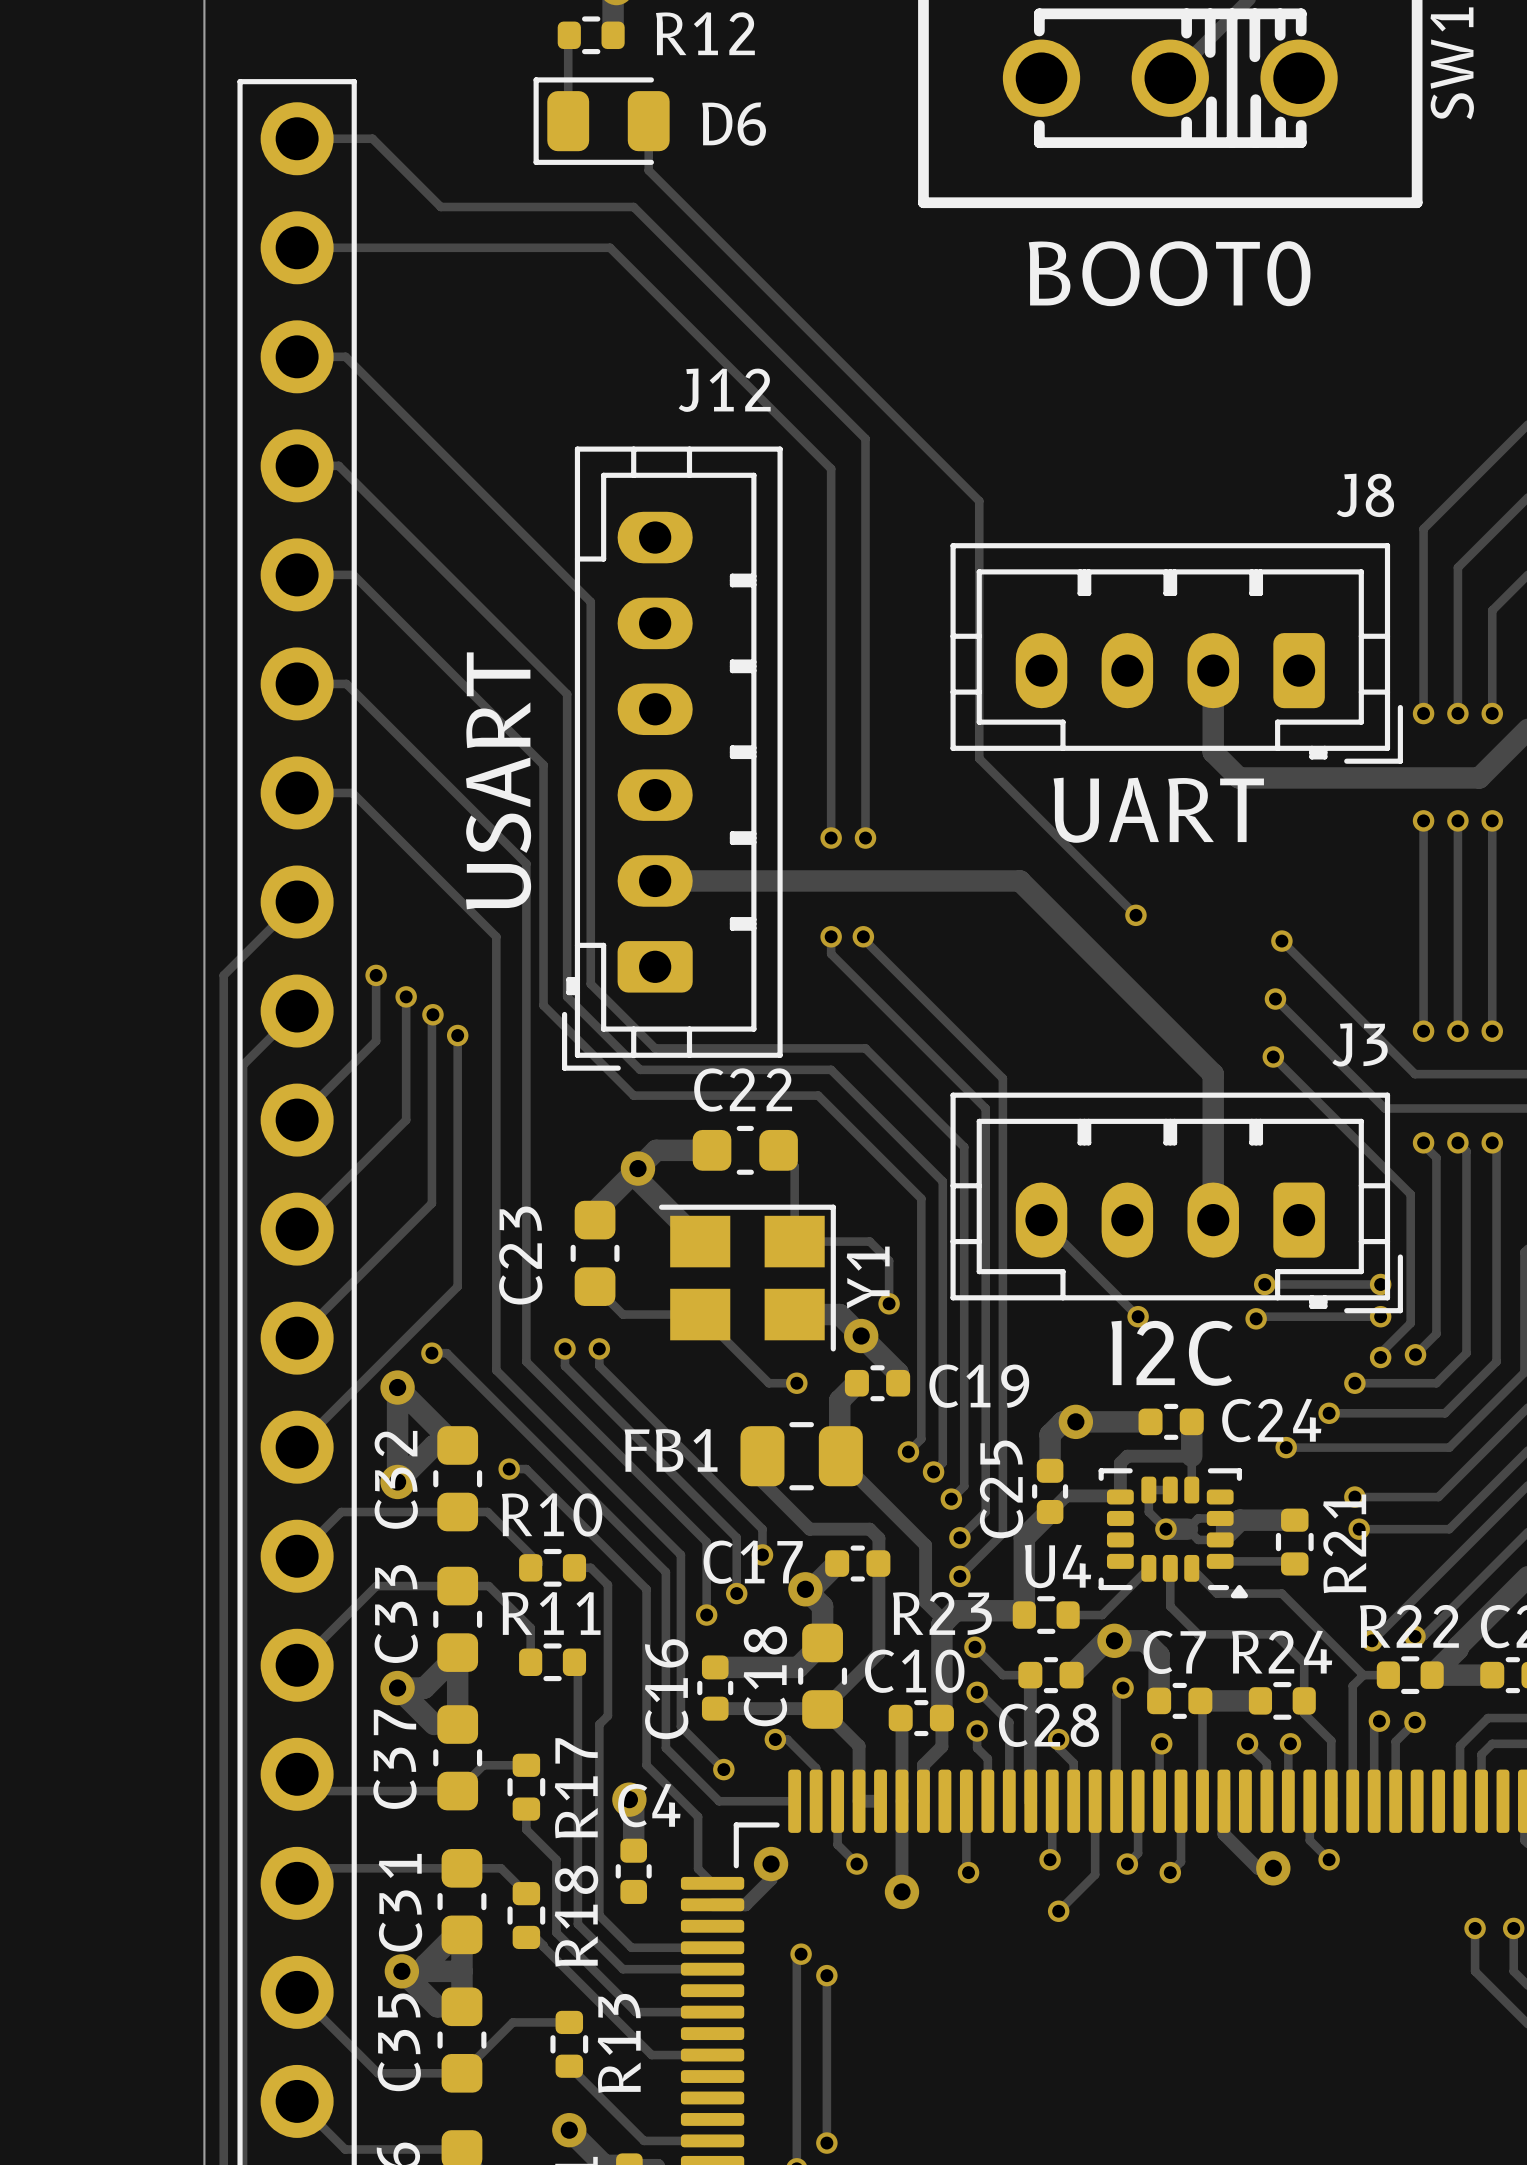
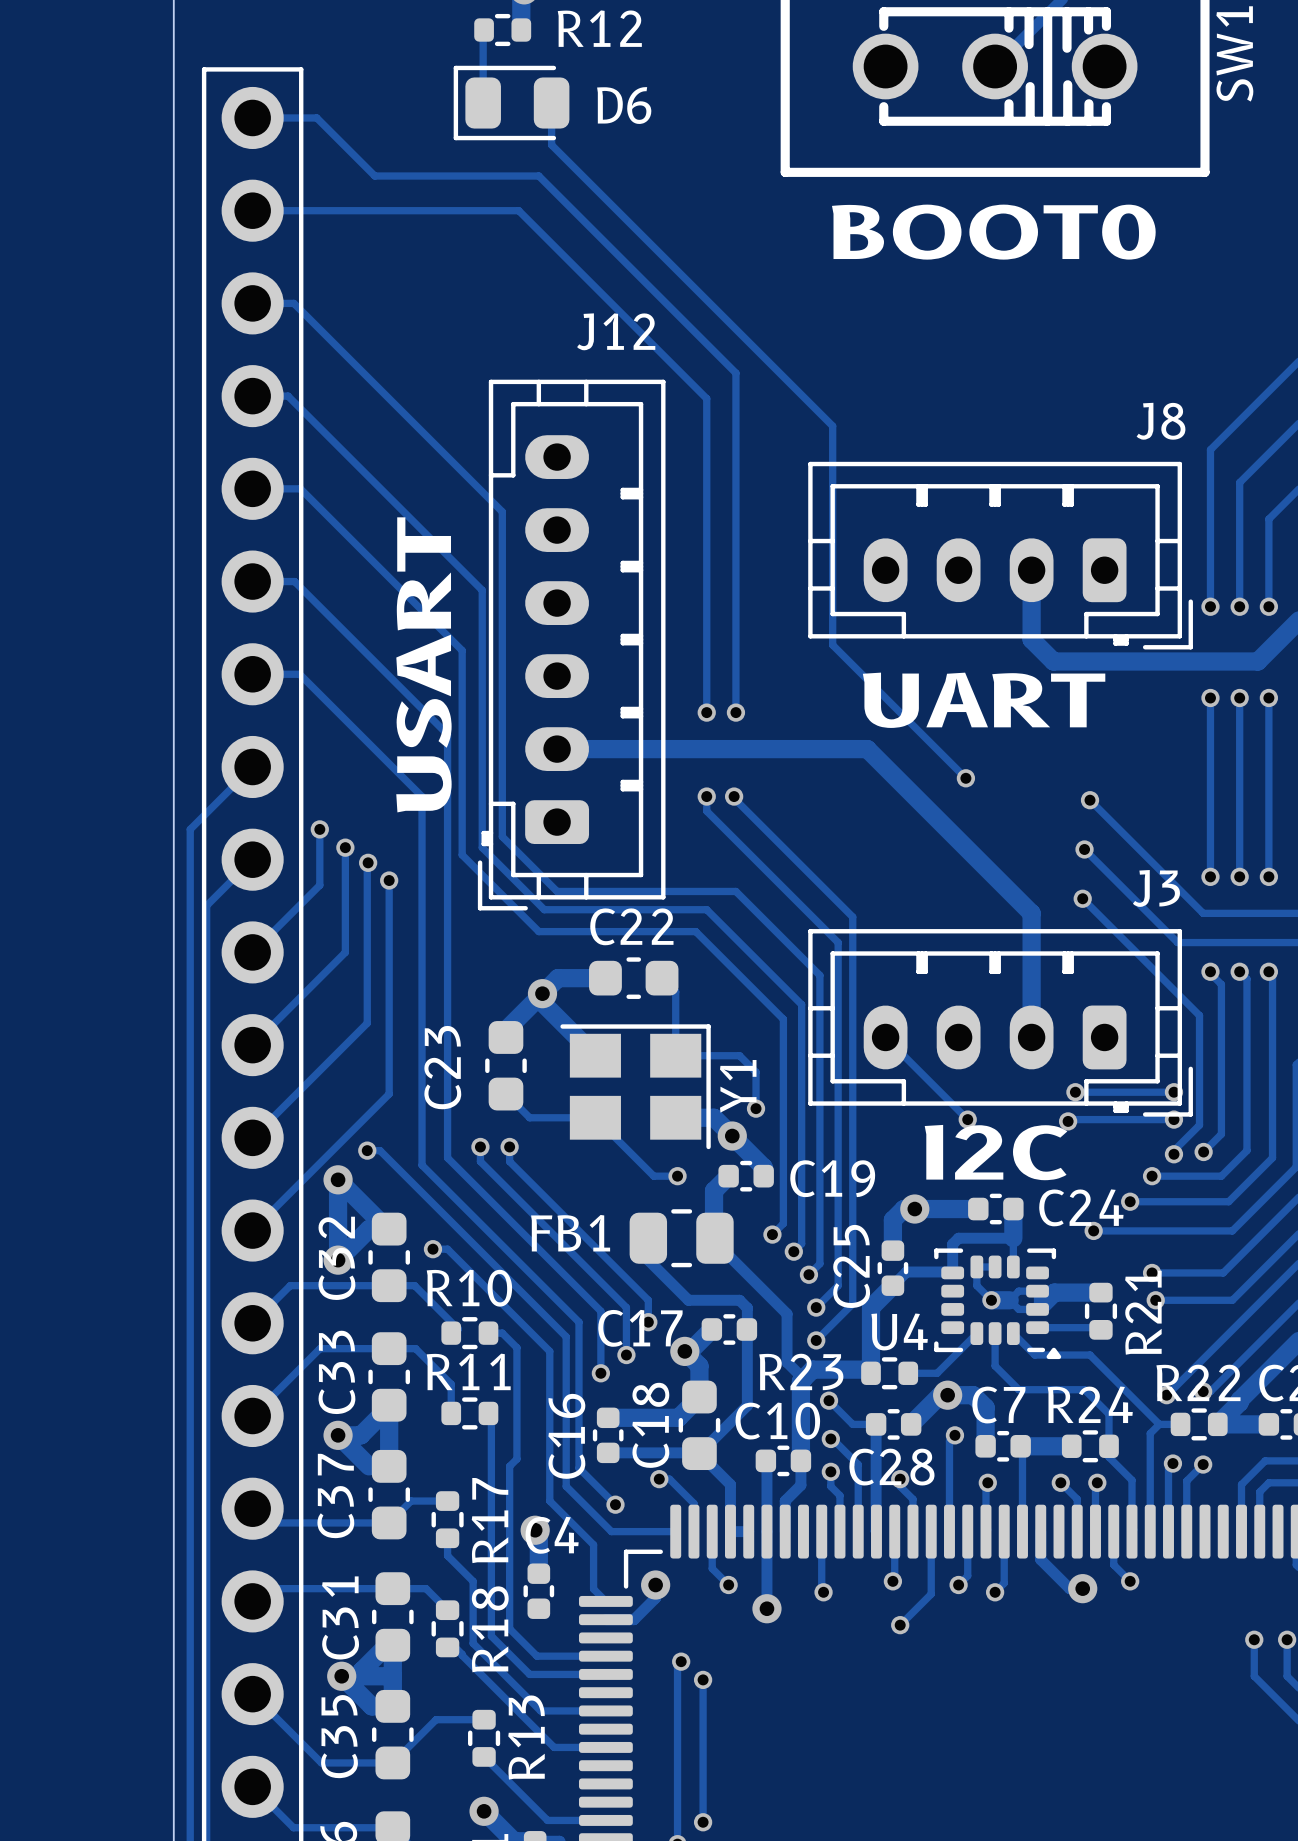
text: none -> BOOT0 (993, 232)
SW1 value: BOOT0 (1169, 273) -> none
J12 value: USART (498, 780) -> none
text: none -> USART (423, 664)
J8 value: UART (1158, 810) -> none
text: none -> UART (984, 700)
J3 value: I2C (1172, 1353) -> none
text: none -> I2C (996, 1152)

